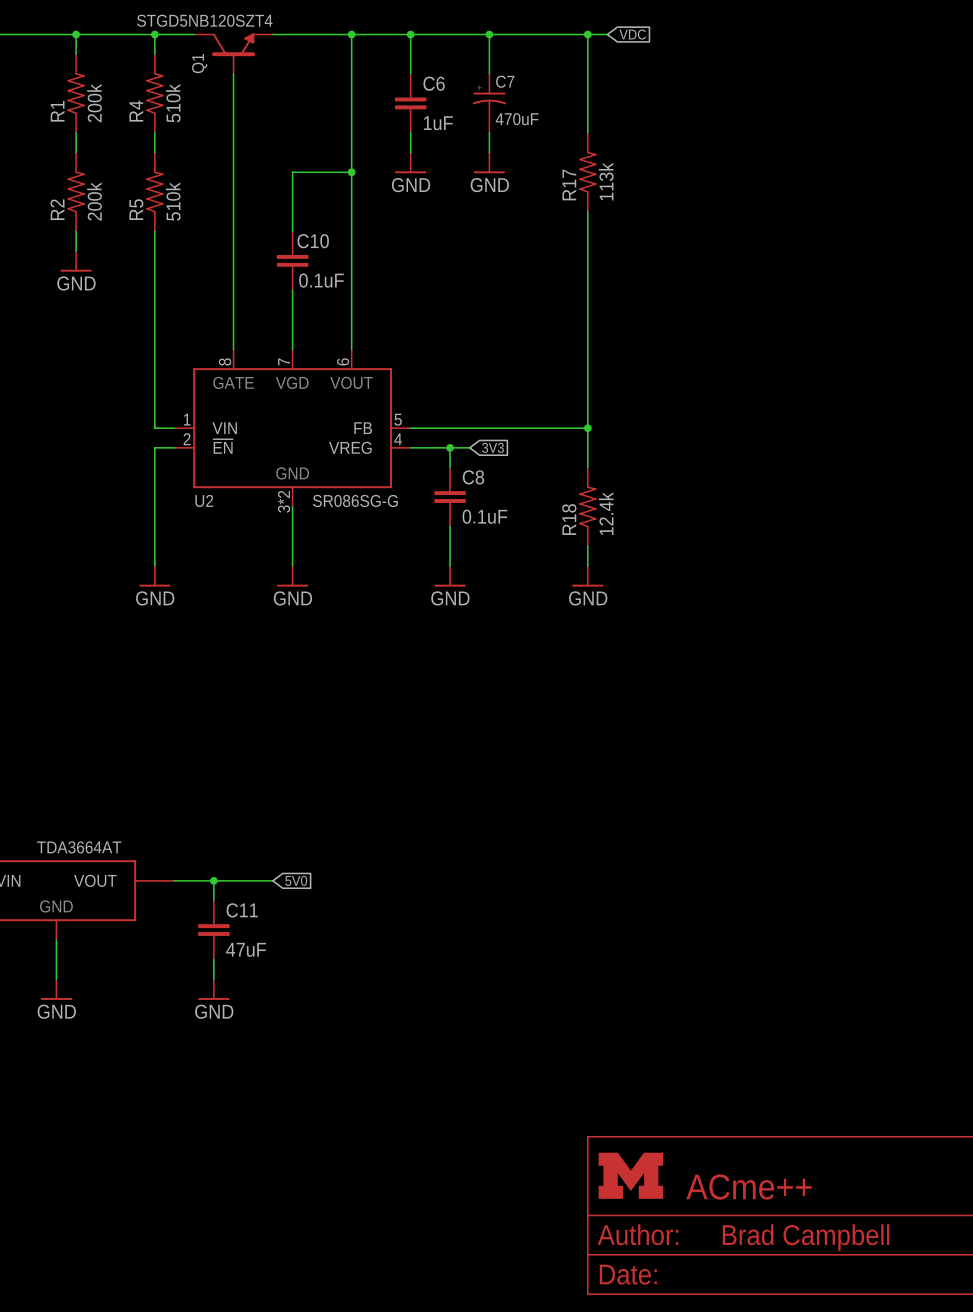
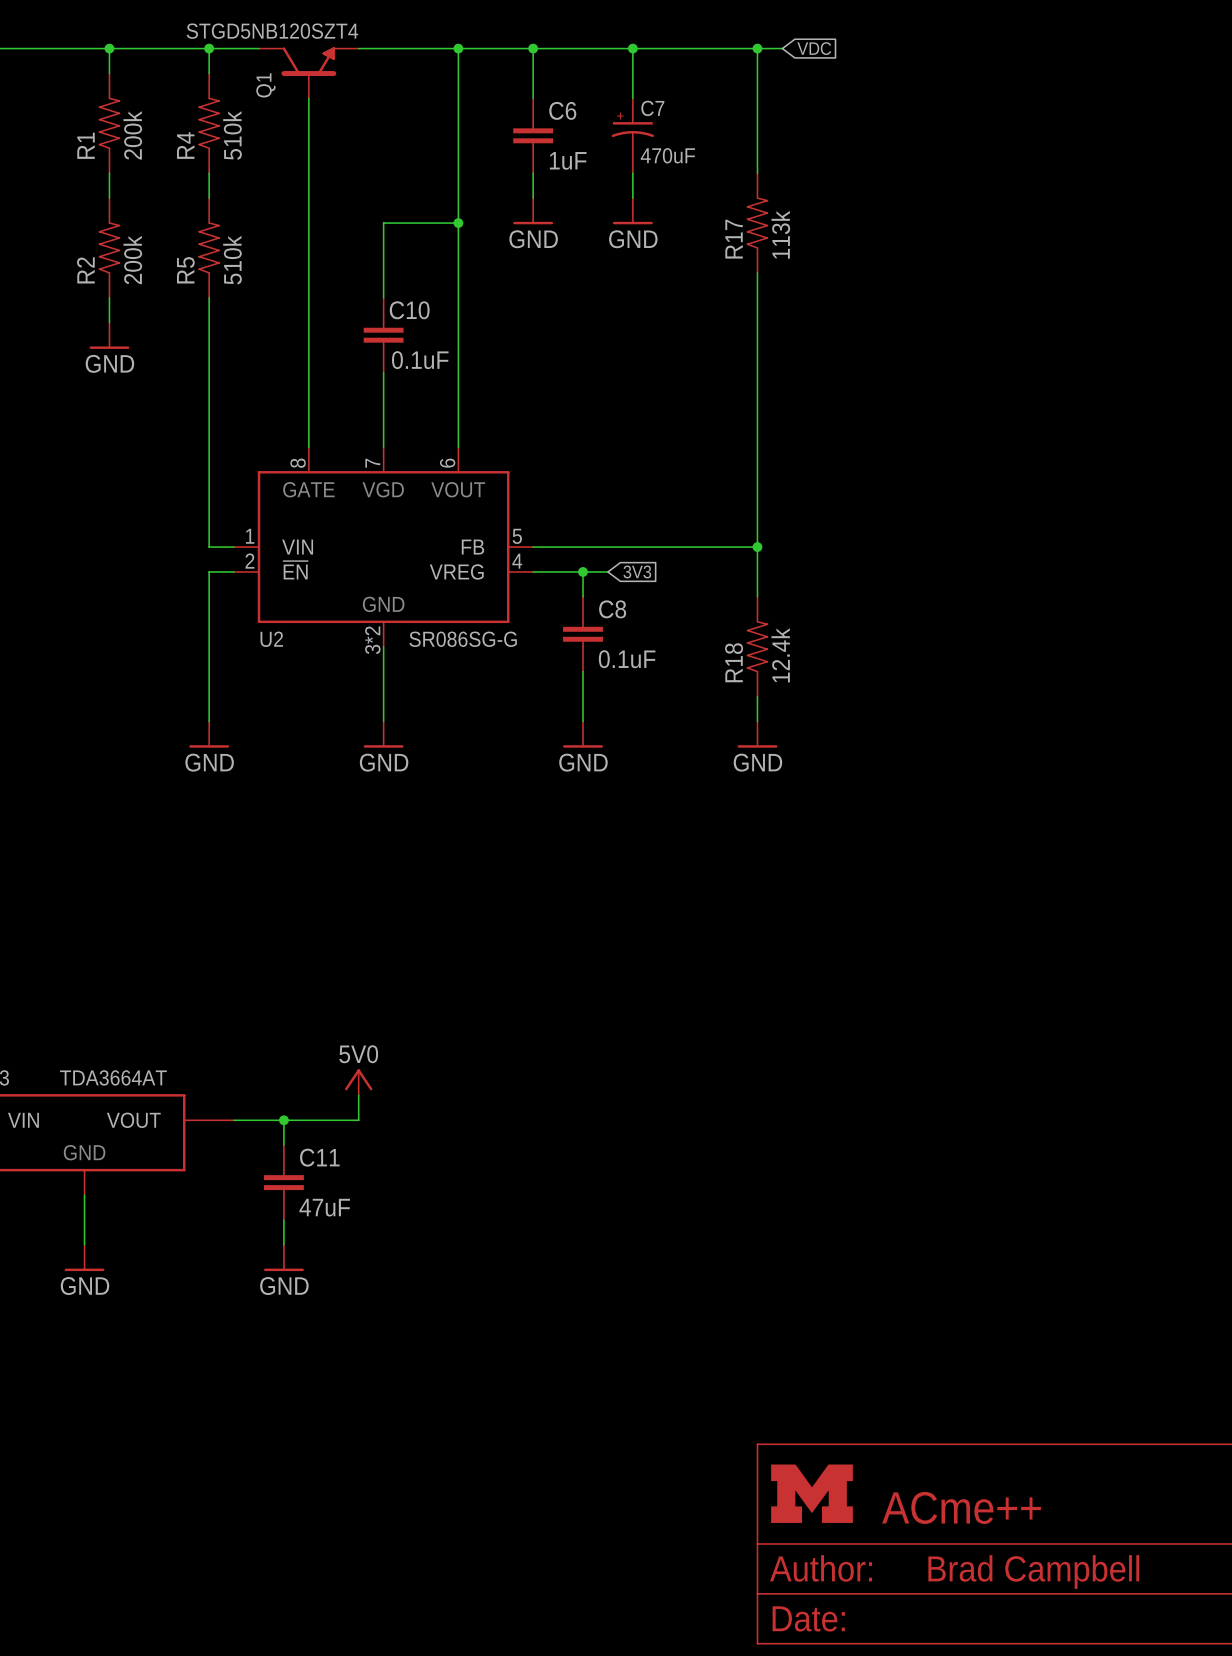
power symbol: none -> 5V0 (358, 1082)
wire: none -> (358, 1095) (358, 1120)
global label: 5V0 (296, 880) -> none

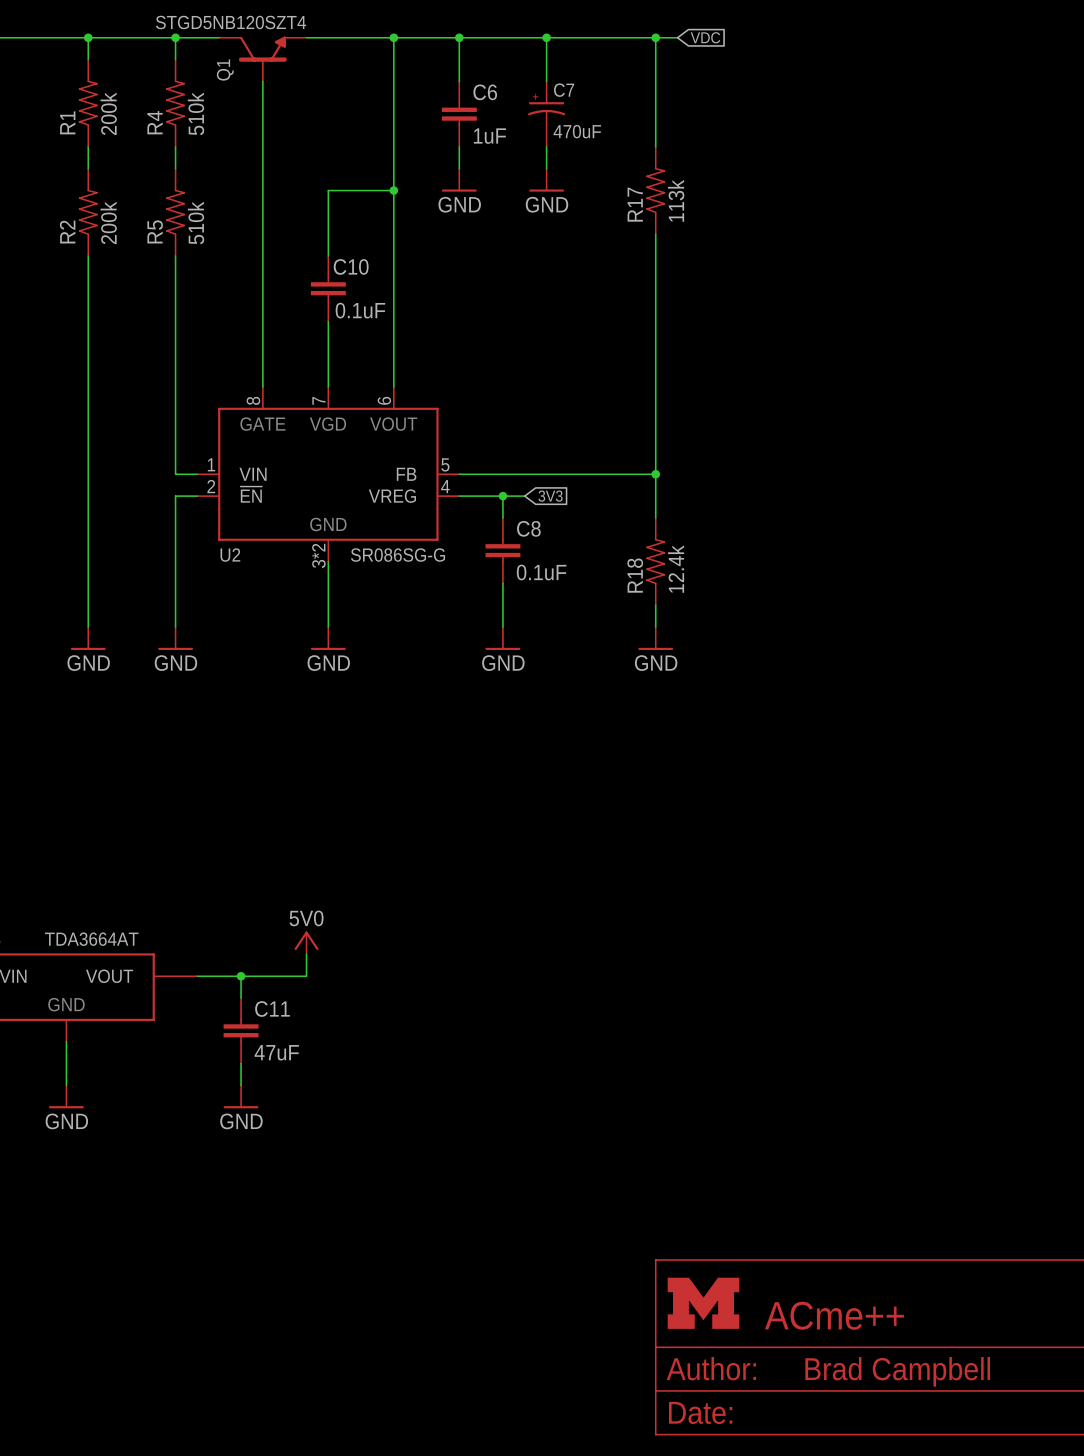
wire: none -> (88, 277) (88, 627)
power symbol: GND (109, 335) -> none
power symbol: none -> GND (88, 638)

